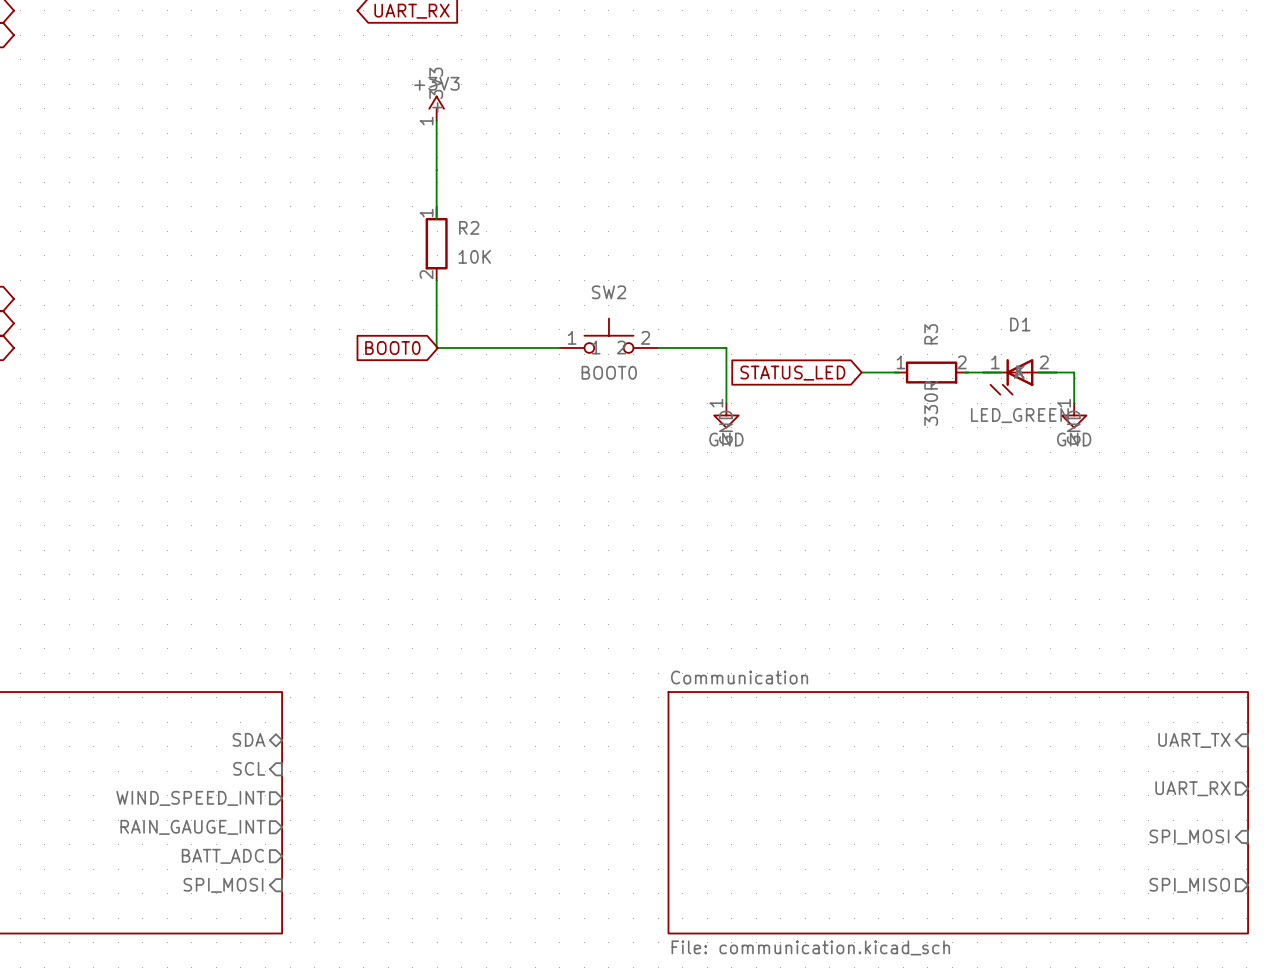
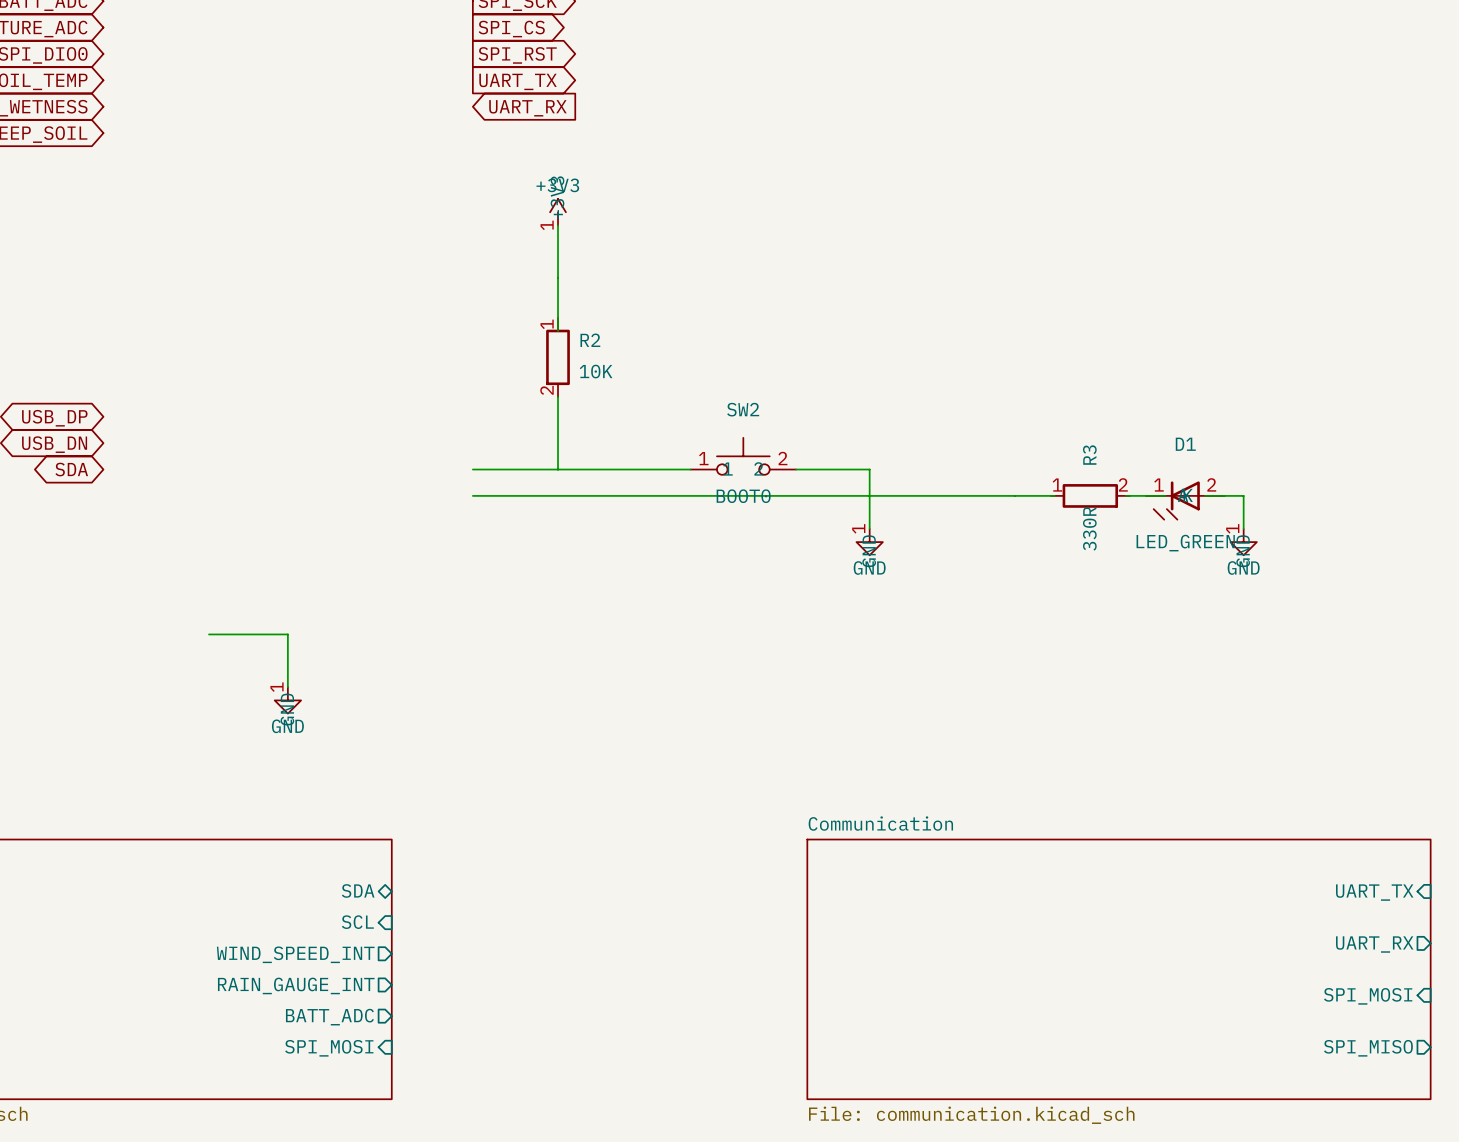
wire: none -> (472, 469) (558, 469)
global label: BOOT0 (392, 347) -> none
wire: none -> (472, 495) (1015, 495)
global label: STATUS_LED (792, 373) -> none
wire: none -> (209, 634) (287, 634) (287, 687)
power symbol: none -> GND (287, 700)

